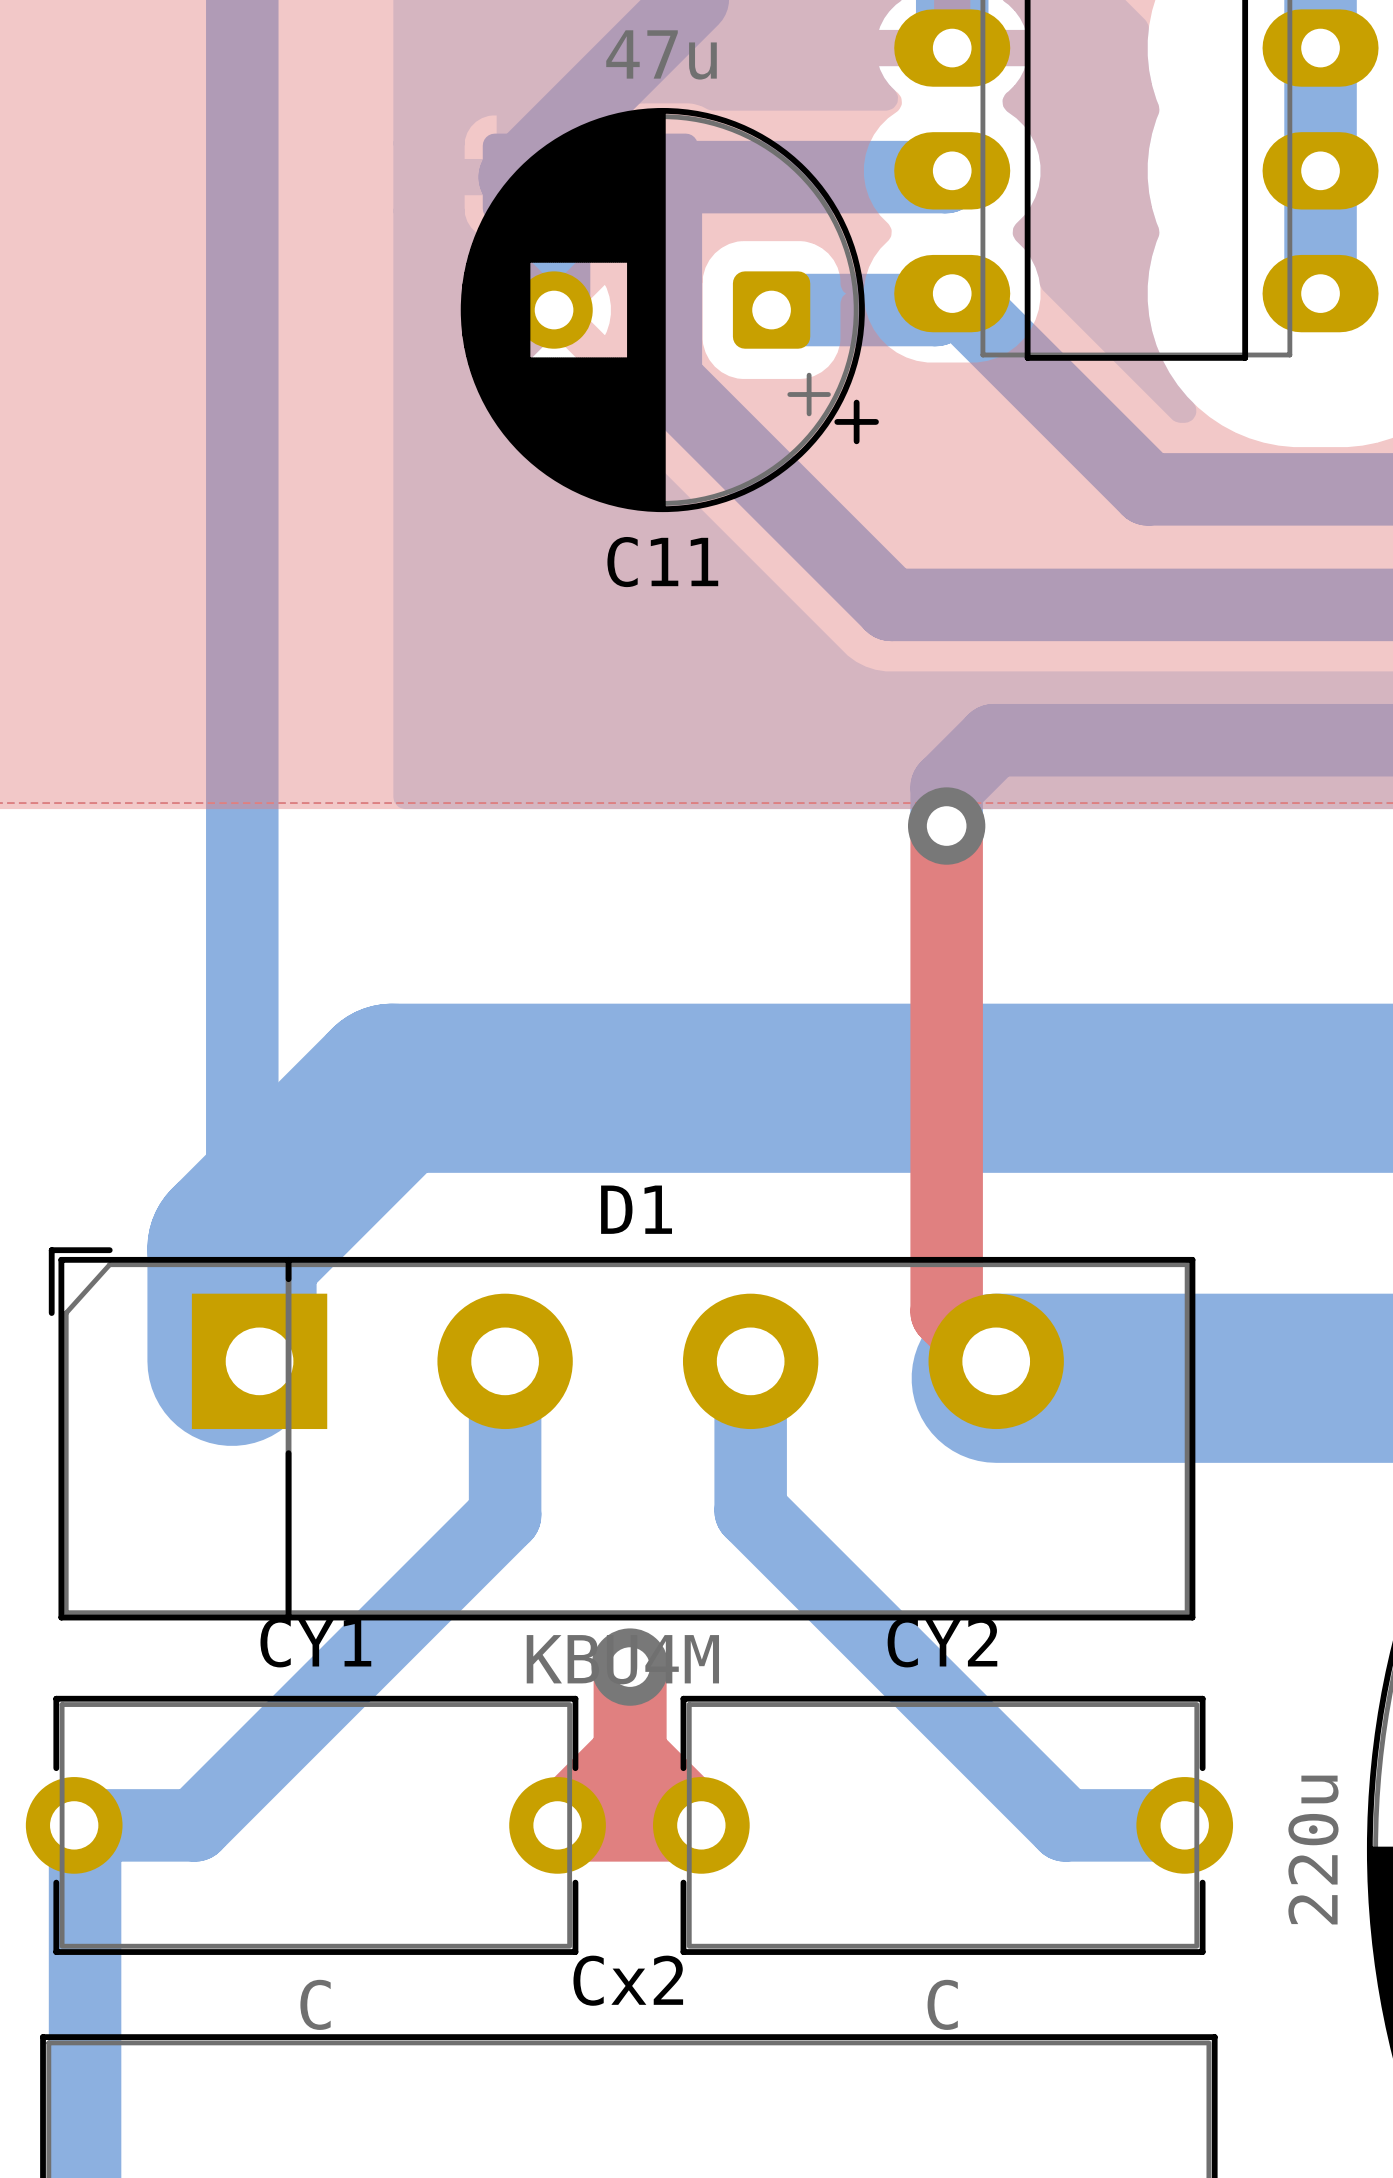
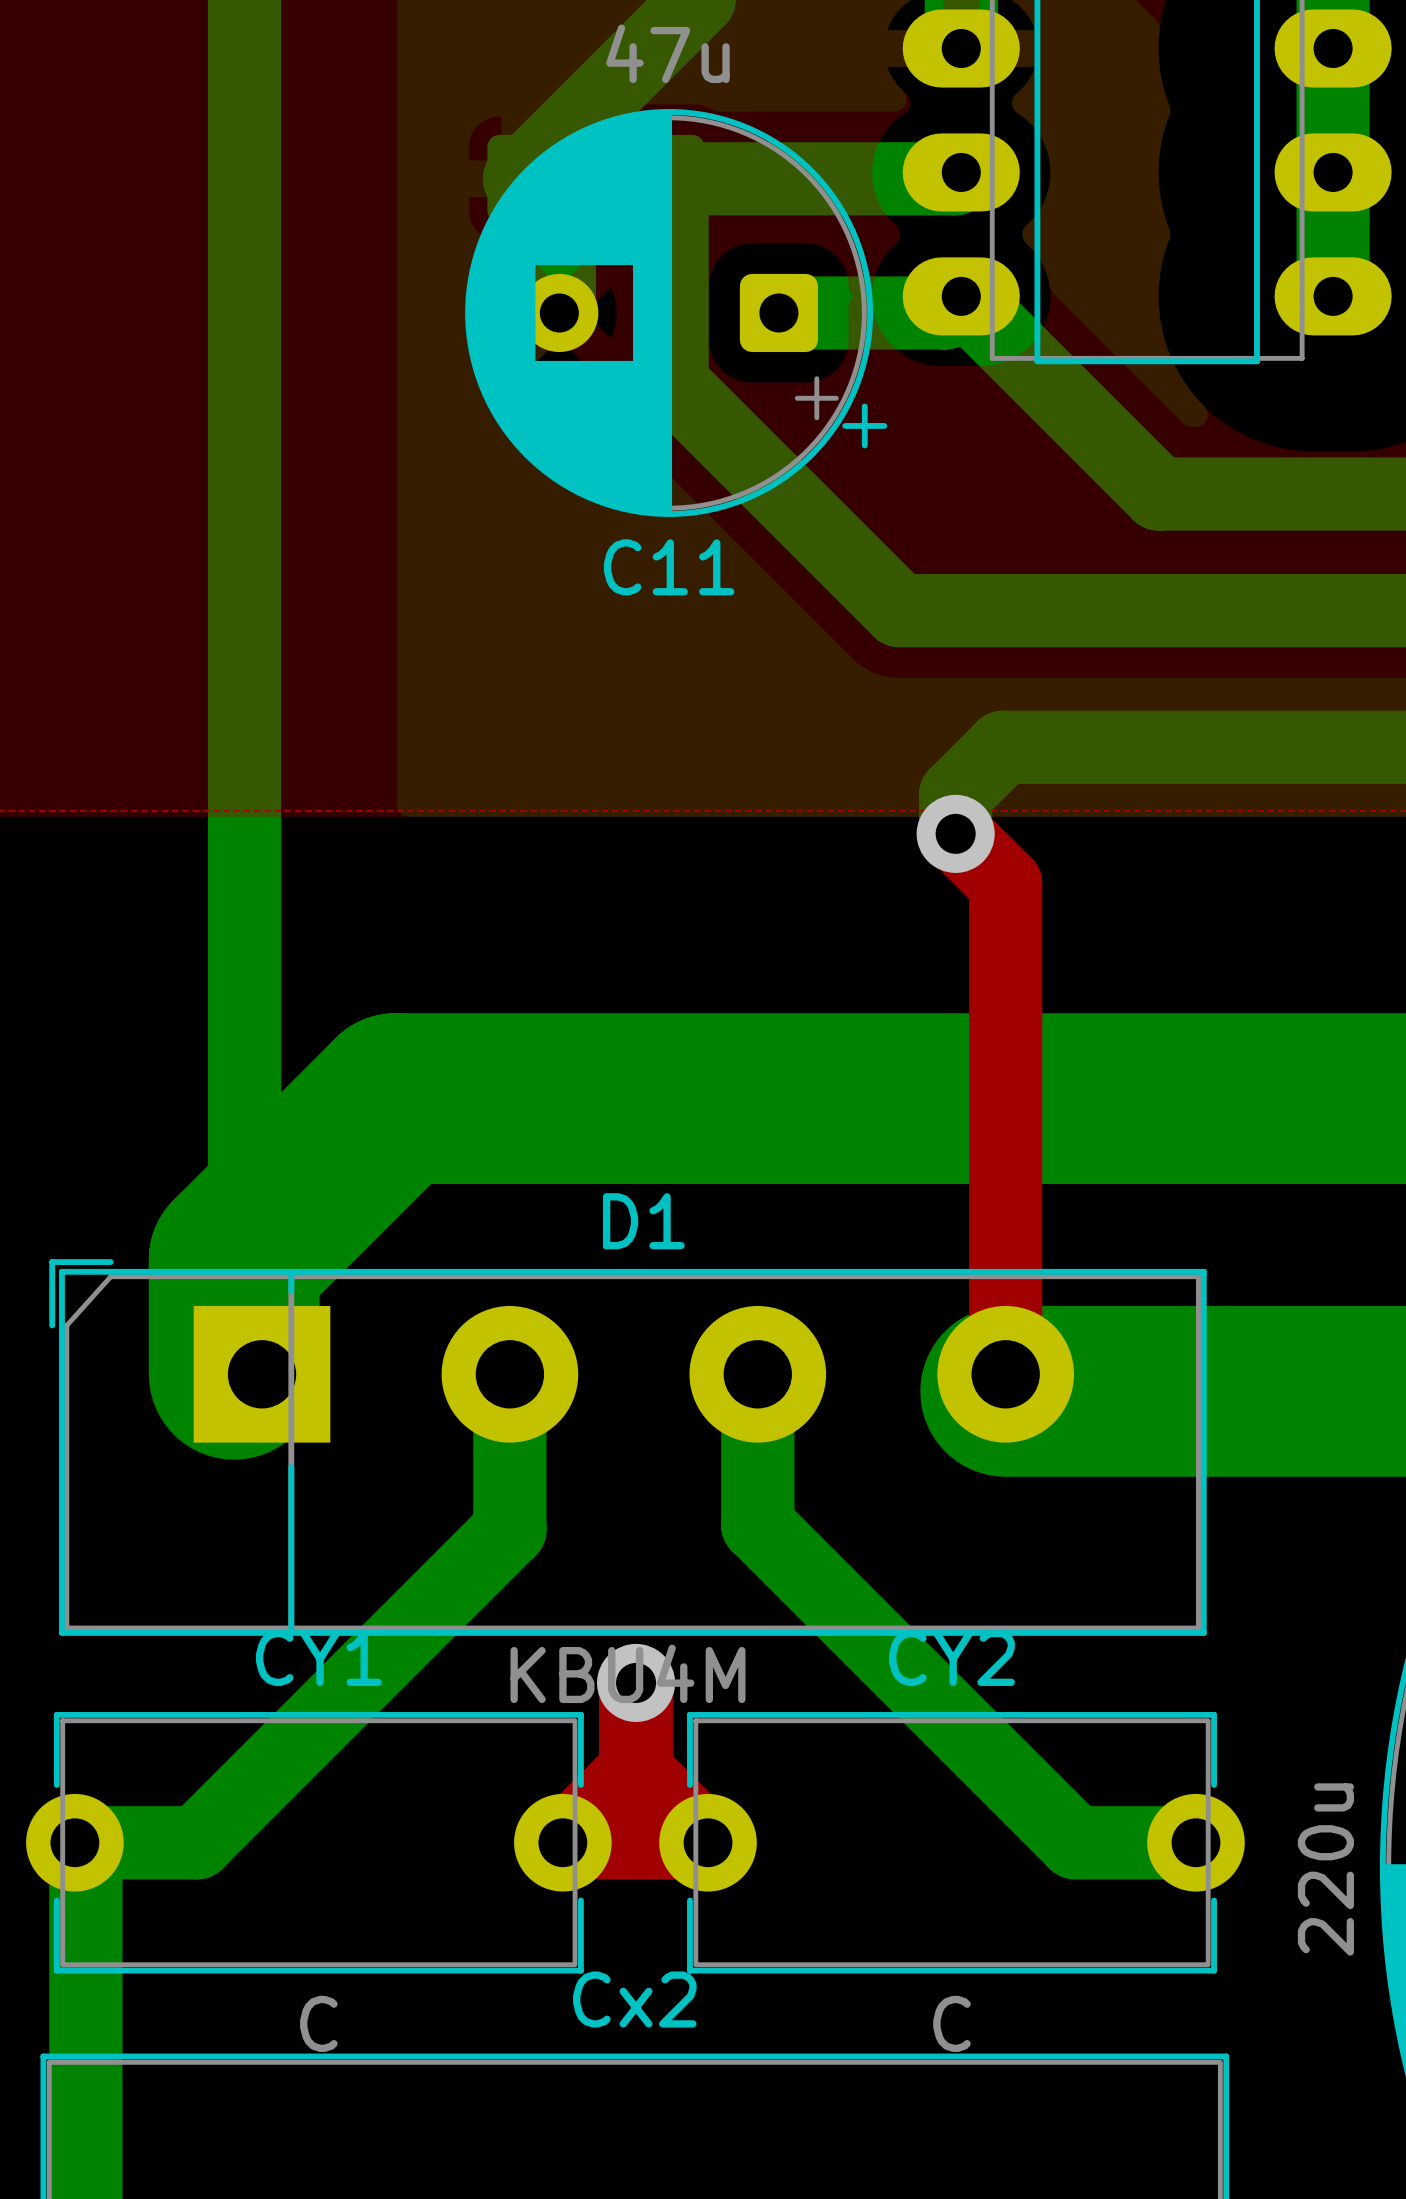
top track: (946, 826) (946, 1311) (996, 1361) -> (955, 833) (1005, 883) (1005, 1374)

